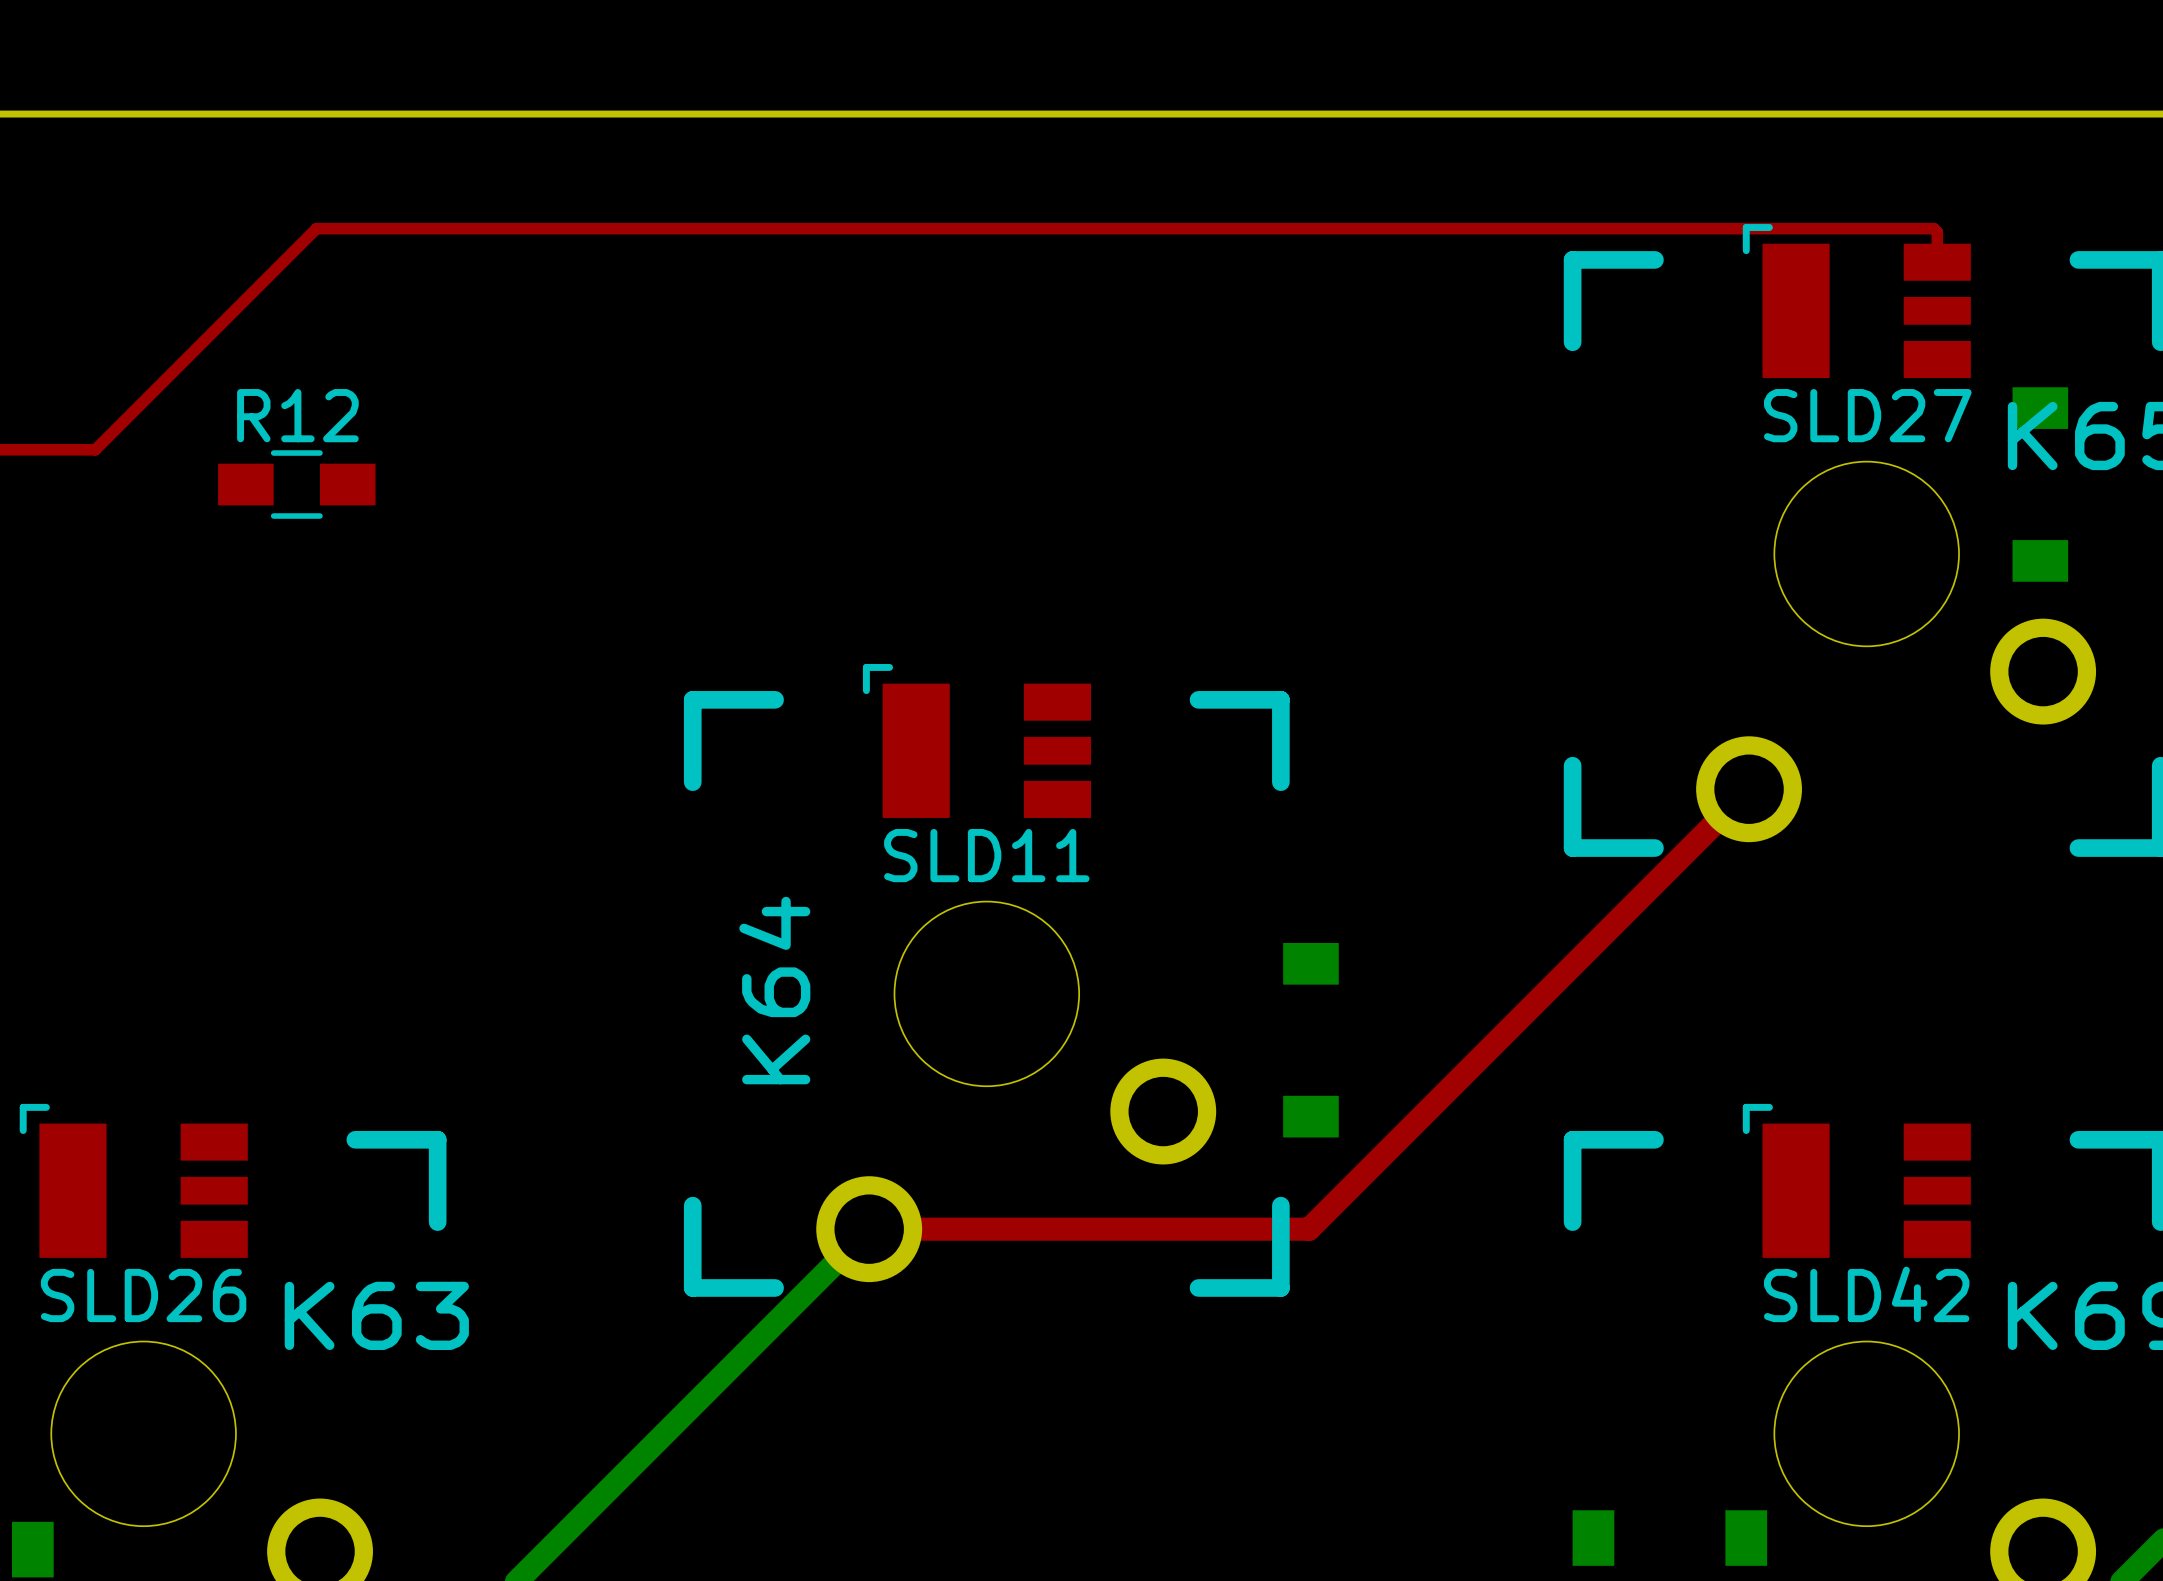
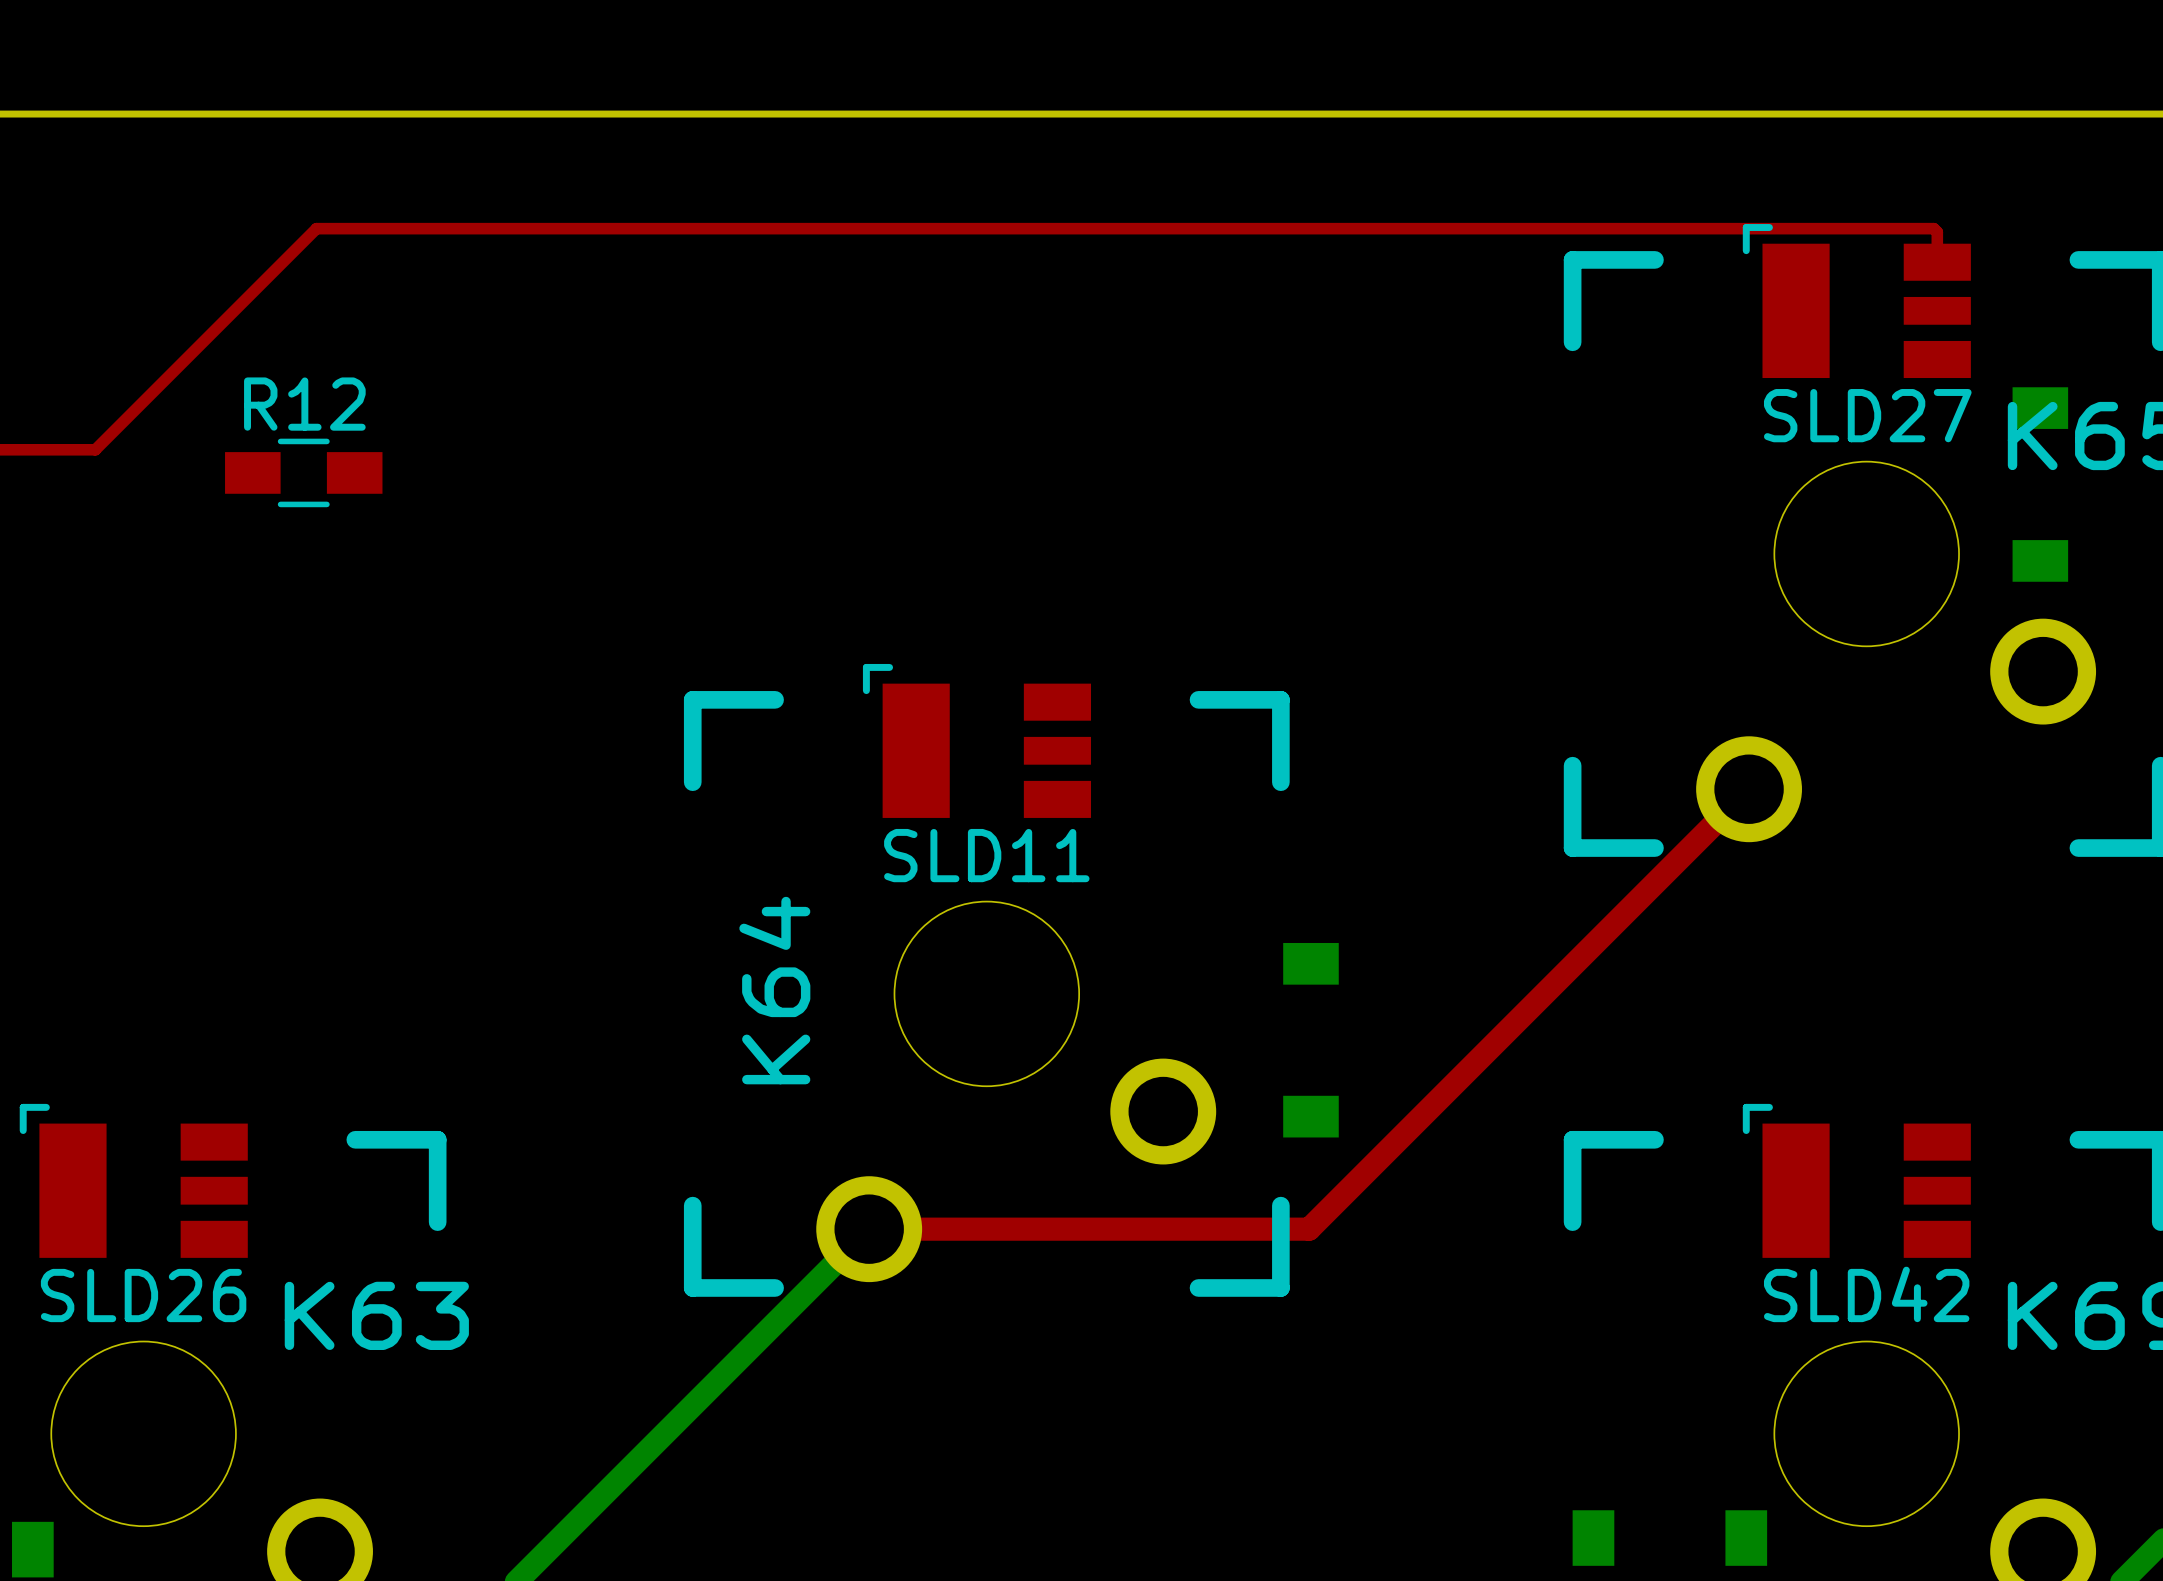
R12 position: (296, 484) -> (303, 472)

